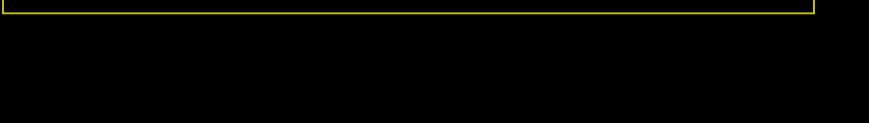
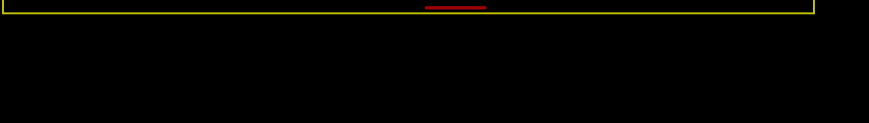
top track: none -> (484, 7) (426, 7)

